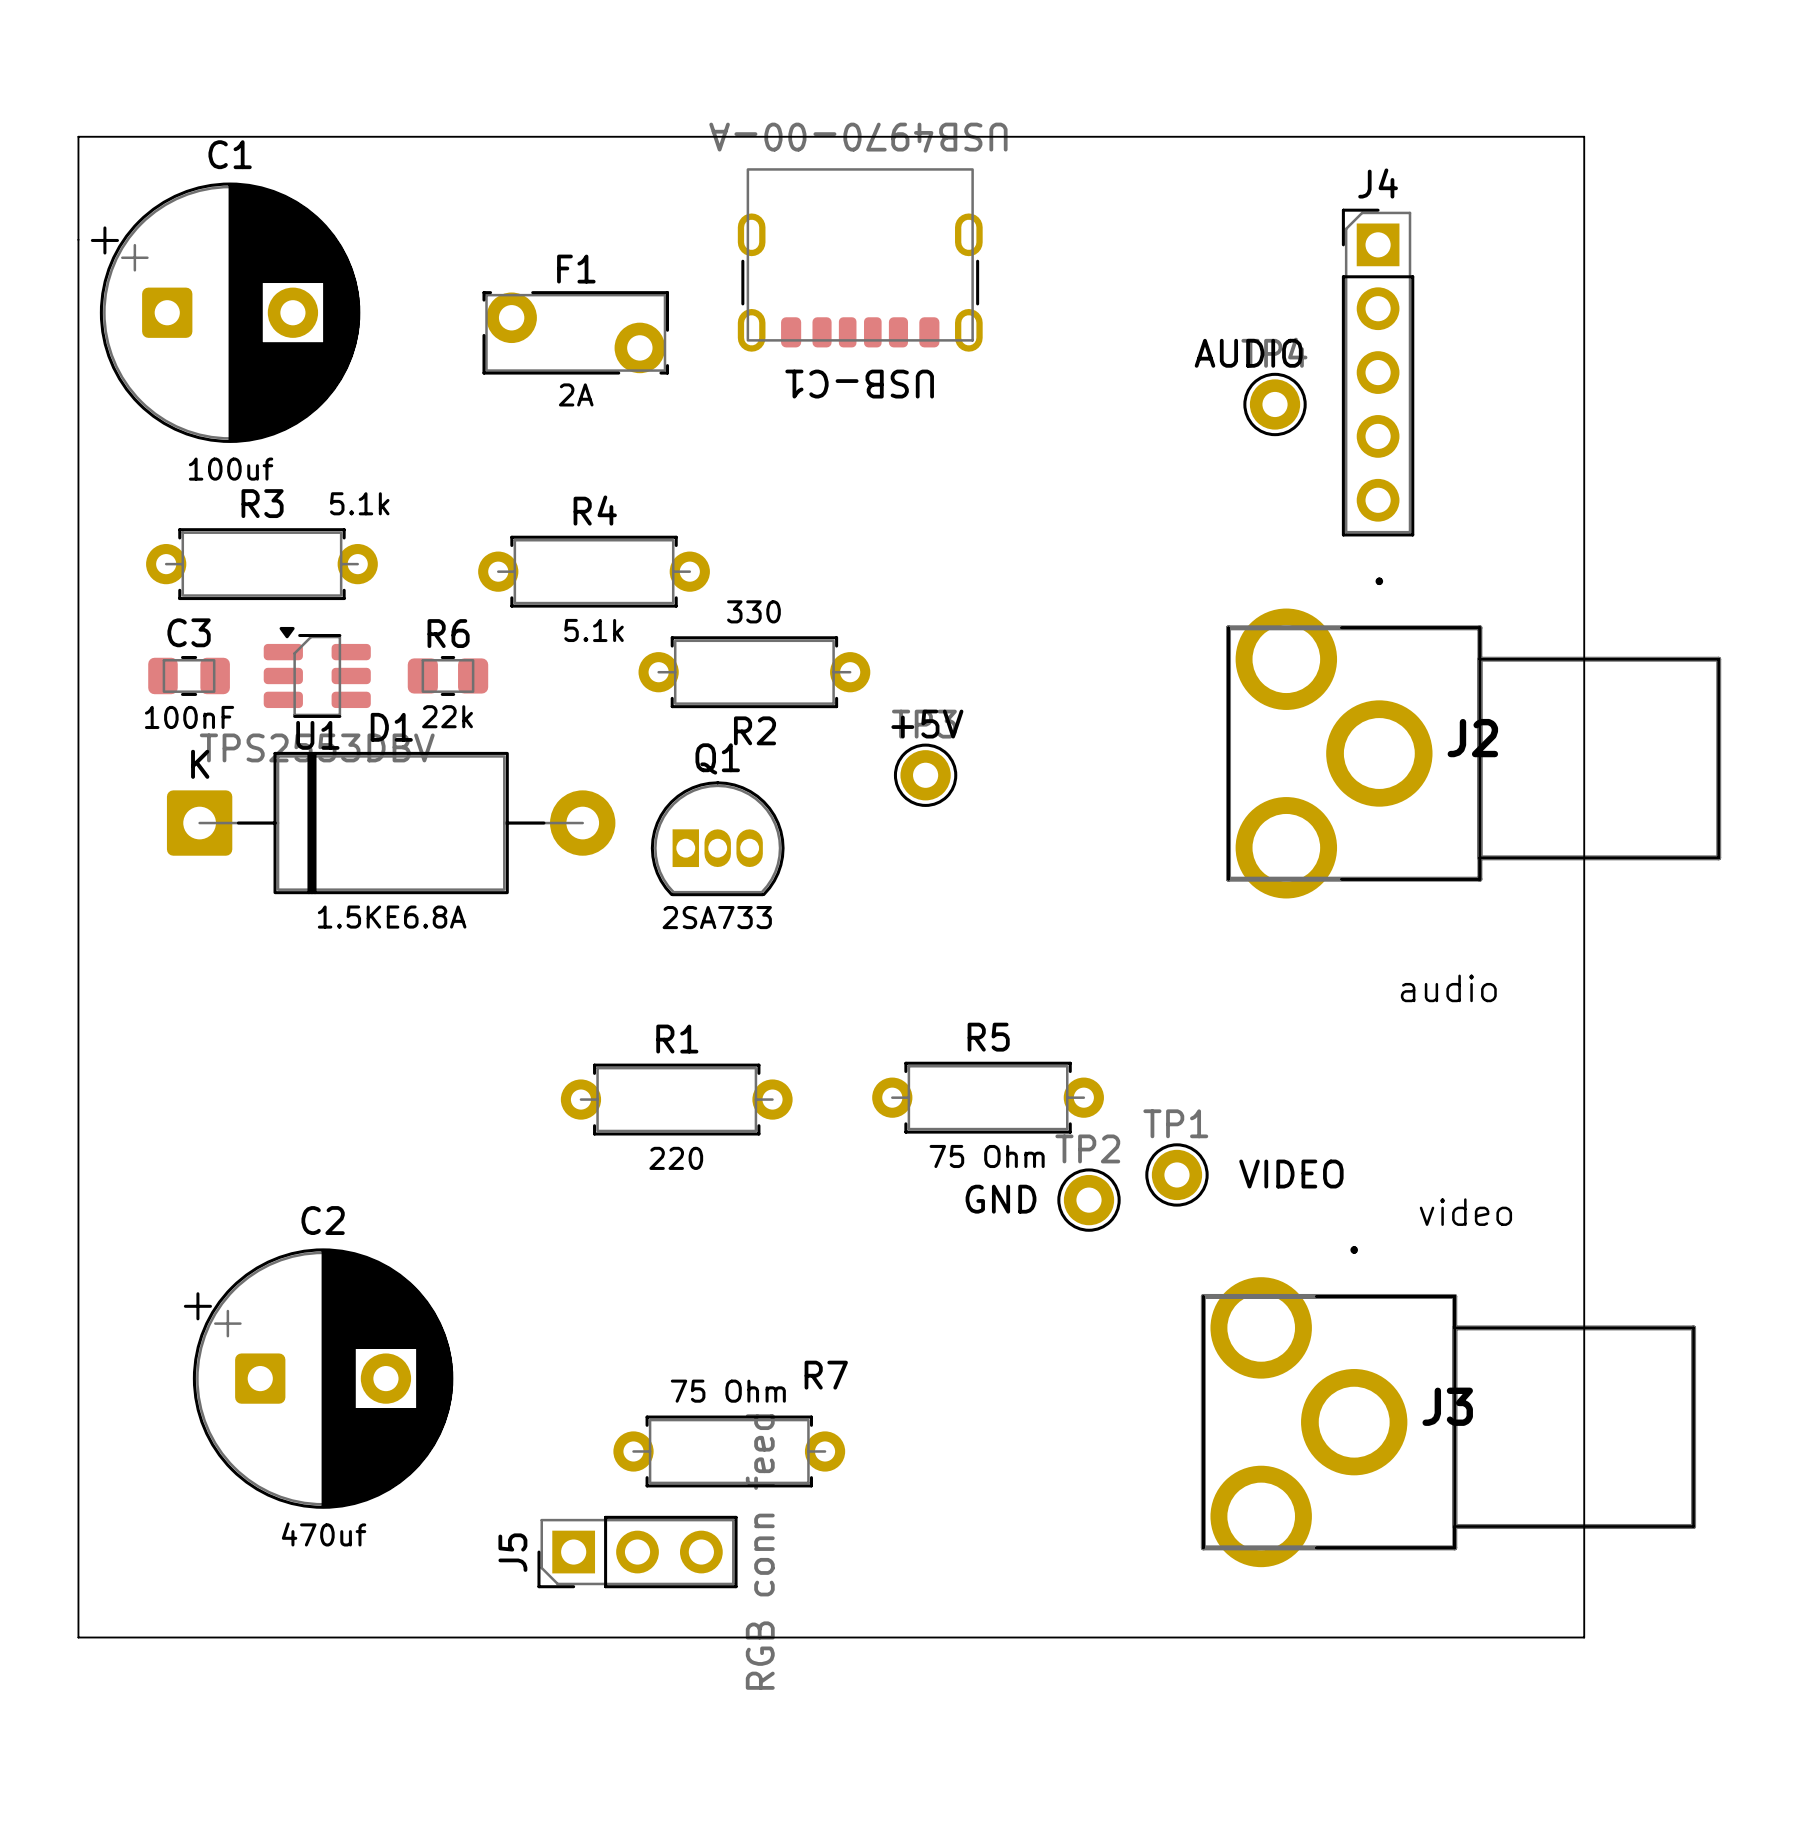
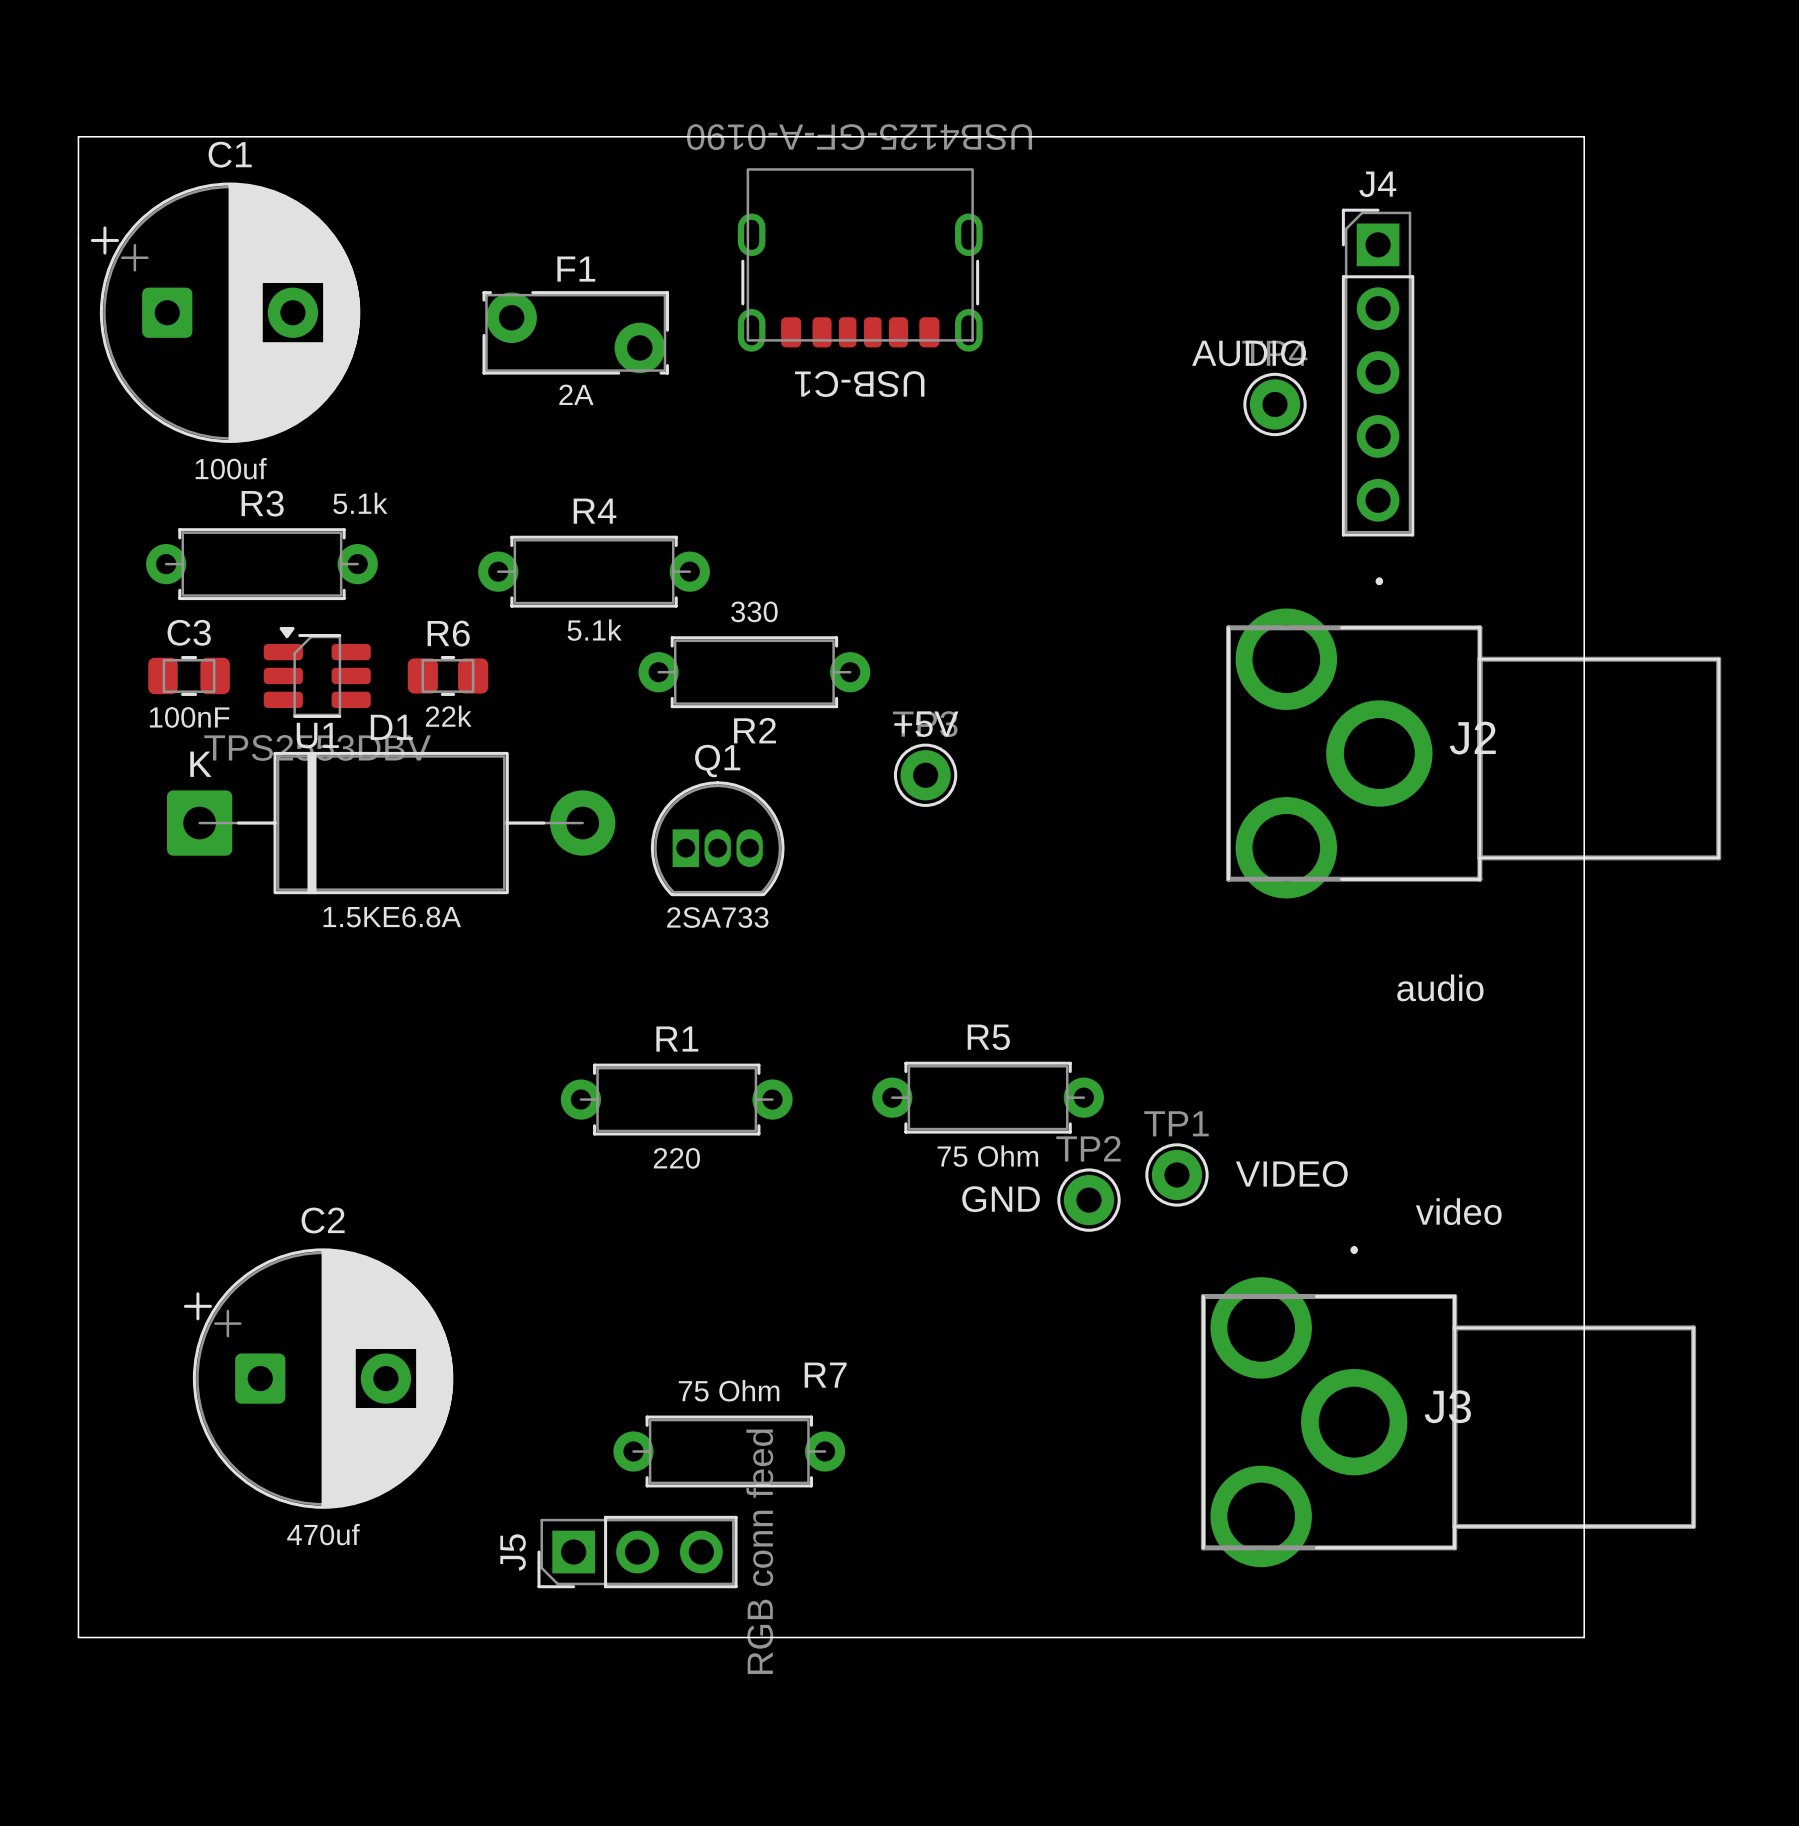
USB-C1 value: USB4970-00-A (858, 137) -> USB4125-GF-A-0190 (859, 137)

